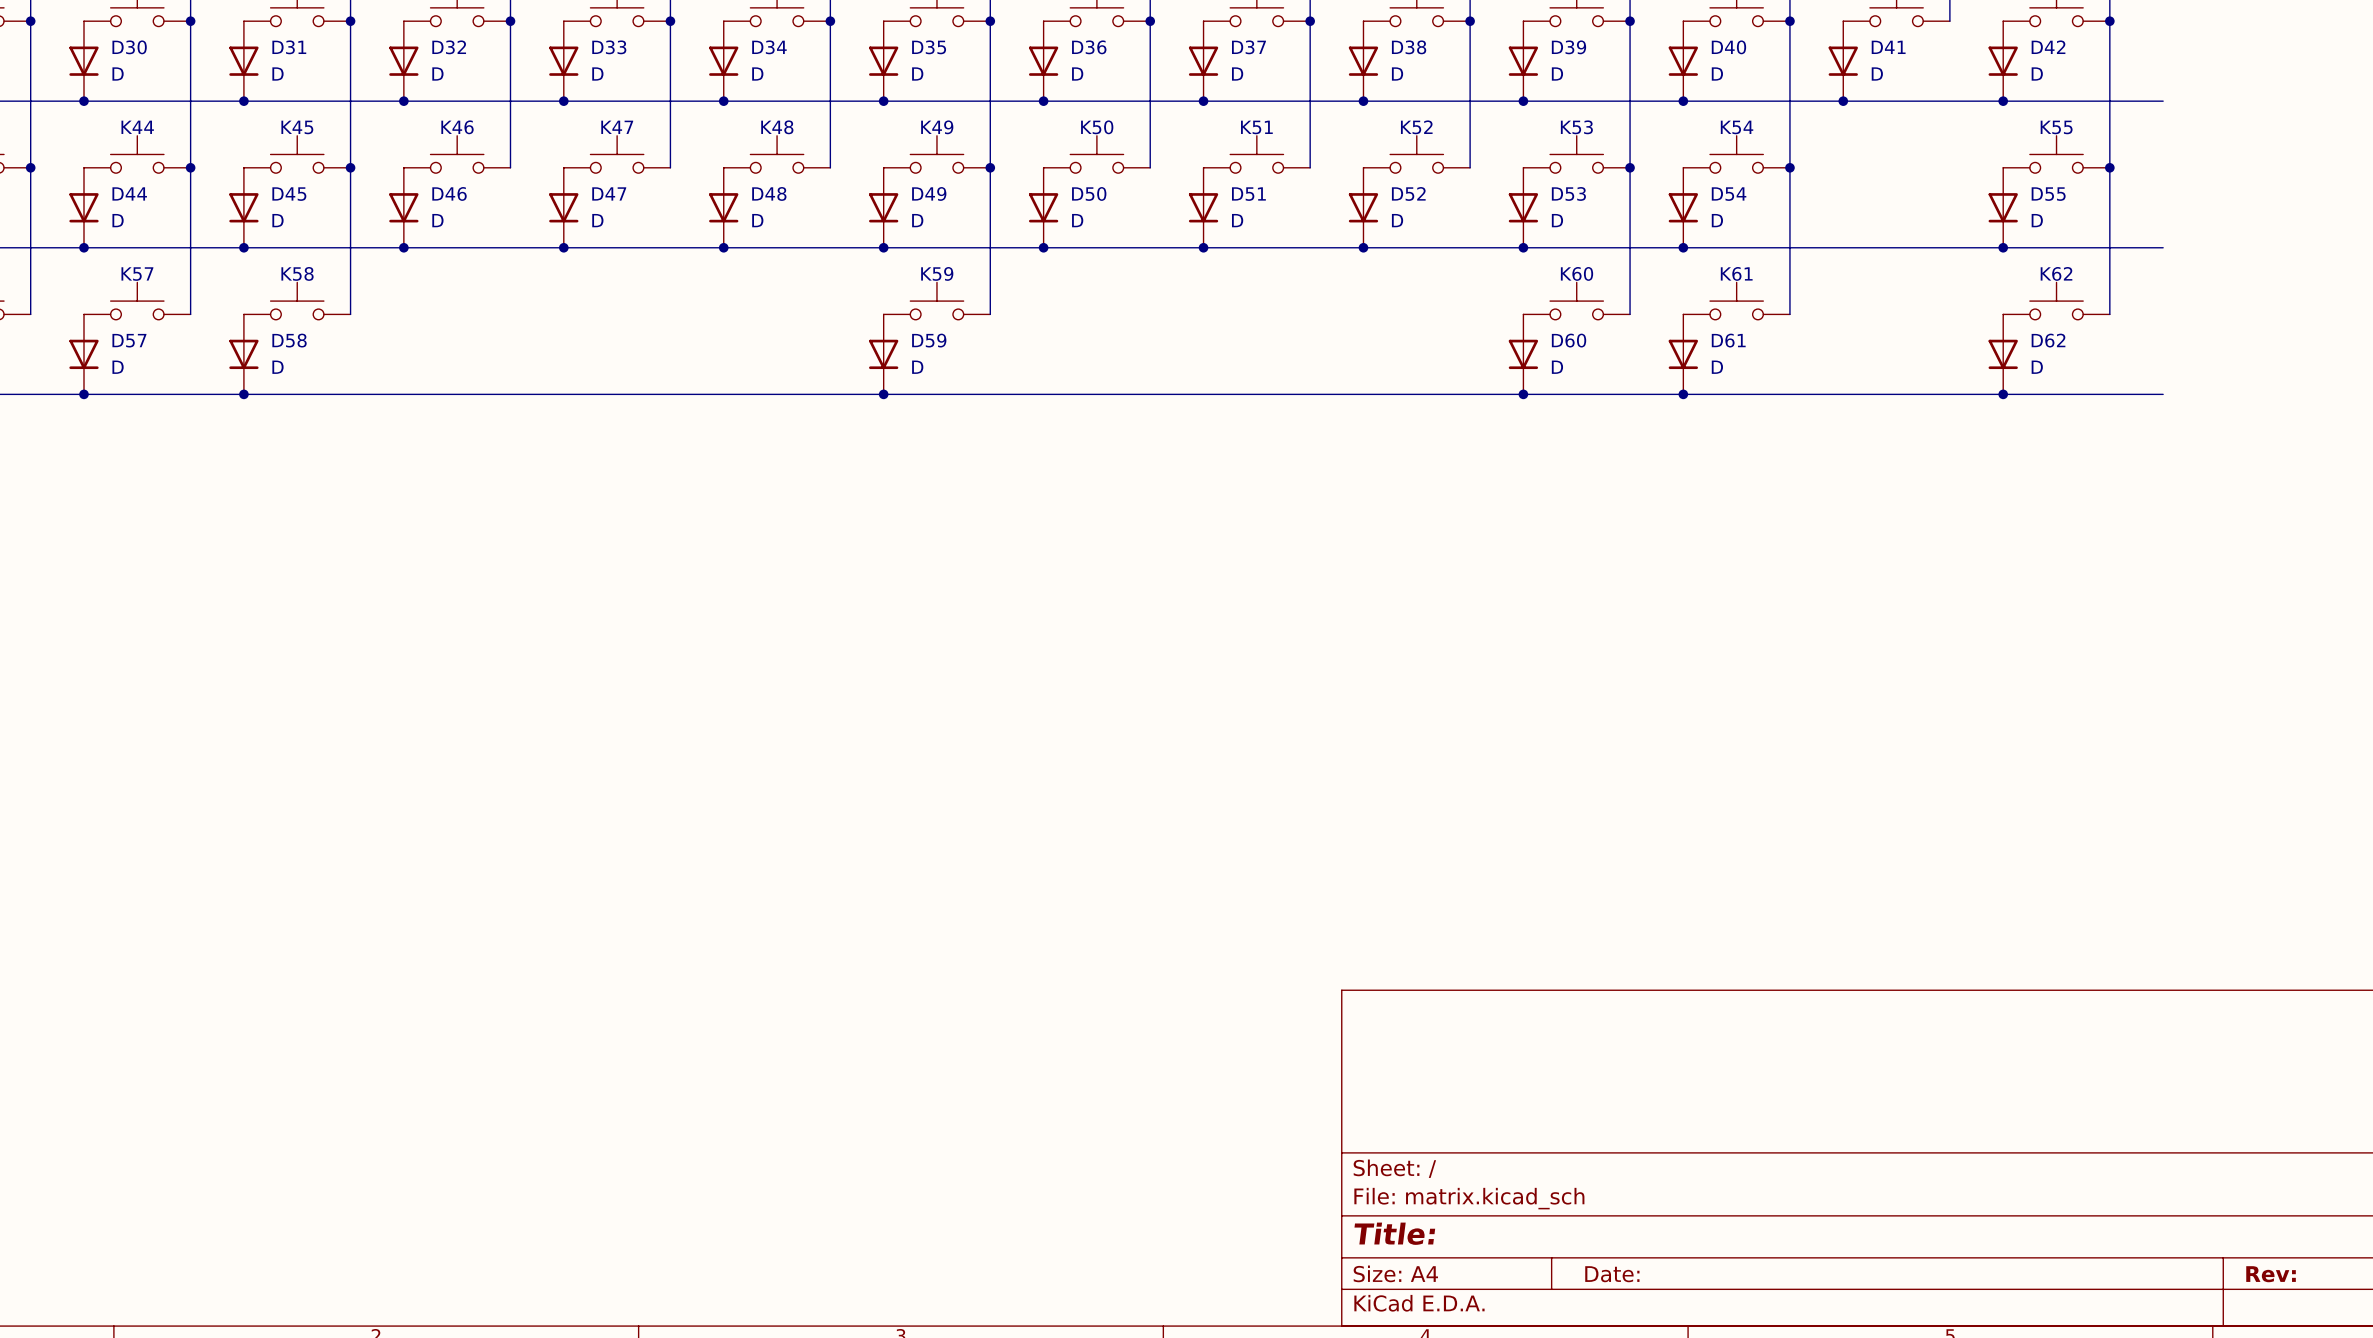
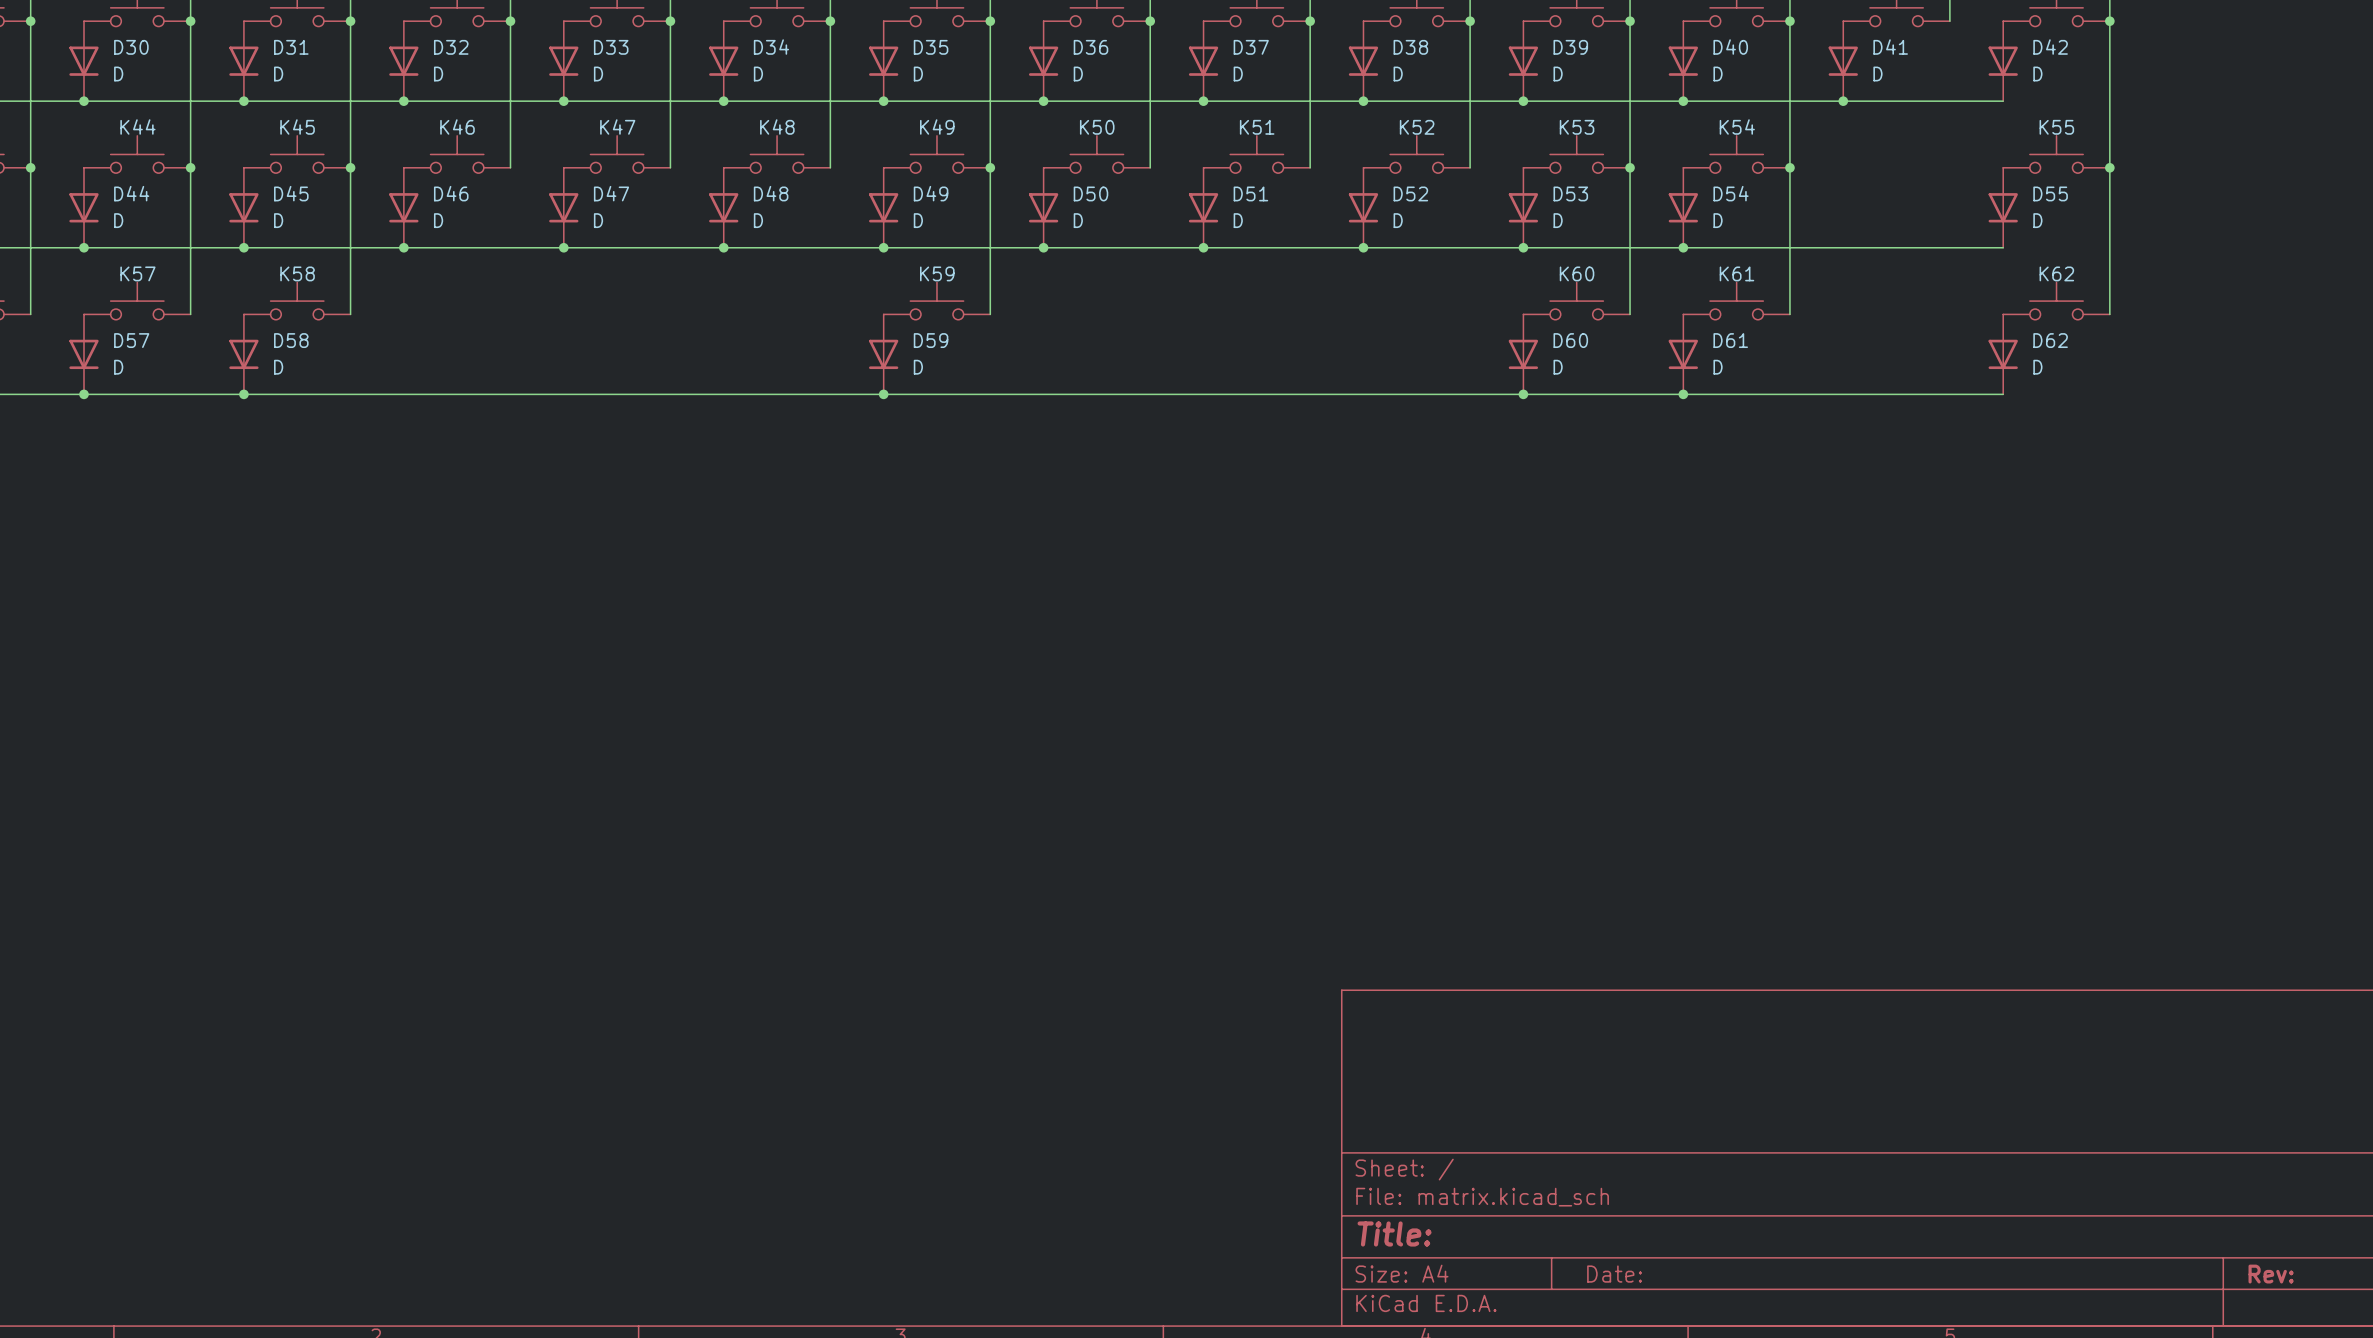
wire: (2003, 101) (2163, 101) -> none
junction: (2003, 101) -> none
wire: (2003, 247) (2163, 247) -> none
junction: (2003, 247) -> none
wire: (2003, 394) (2163, 394) -> none
junction: (2003, 394) -> none

